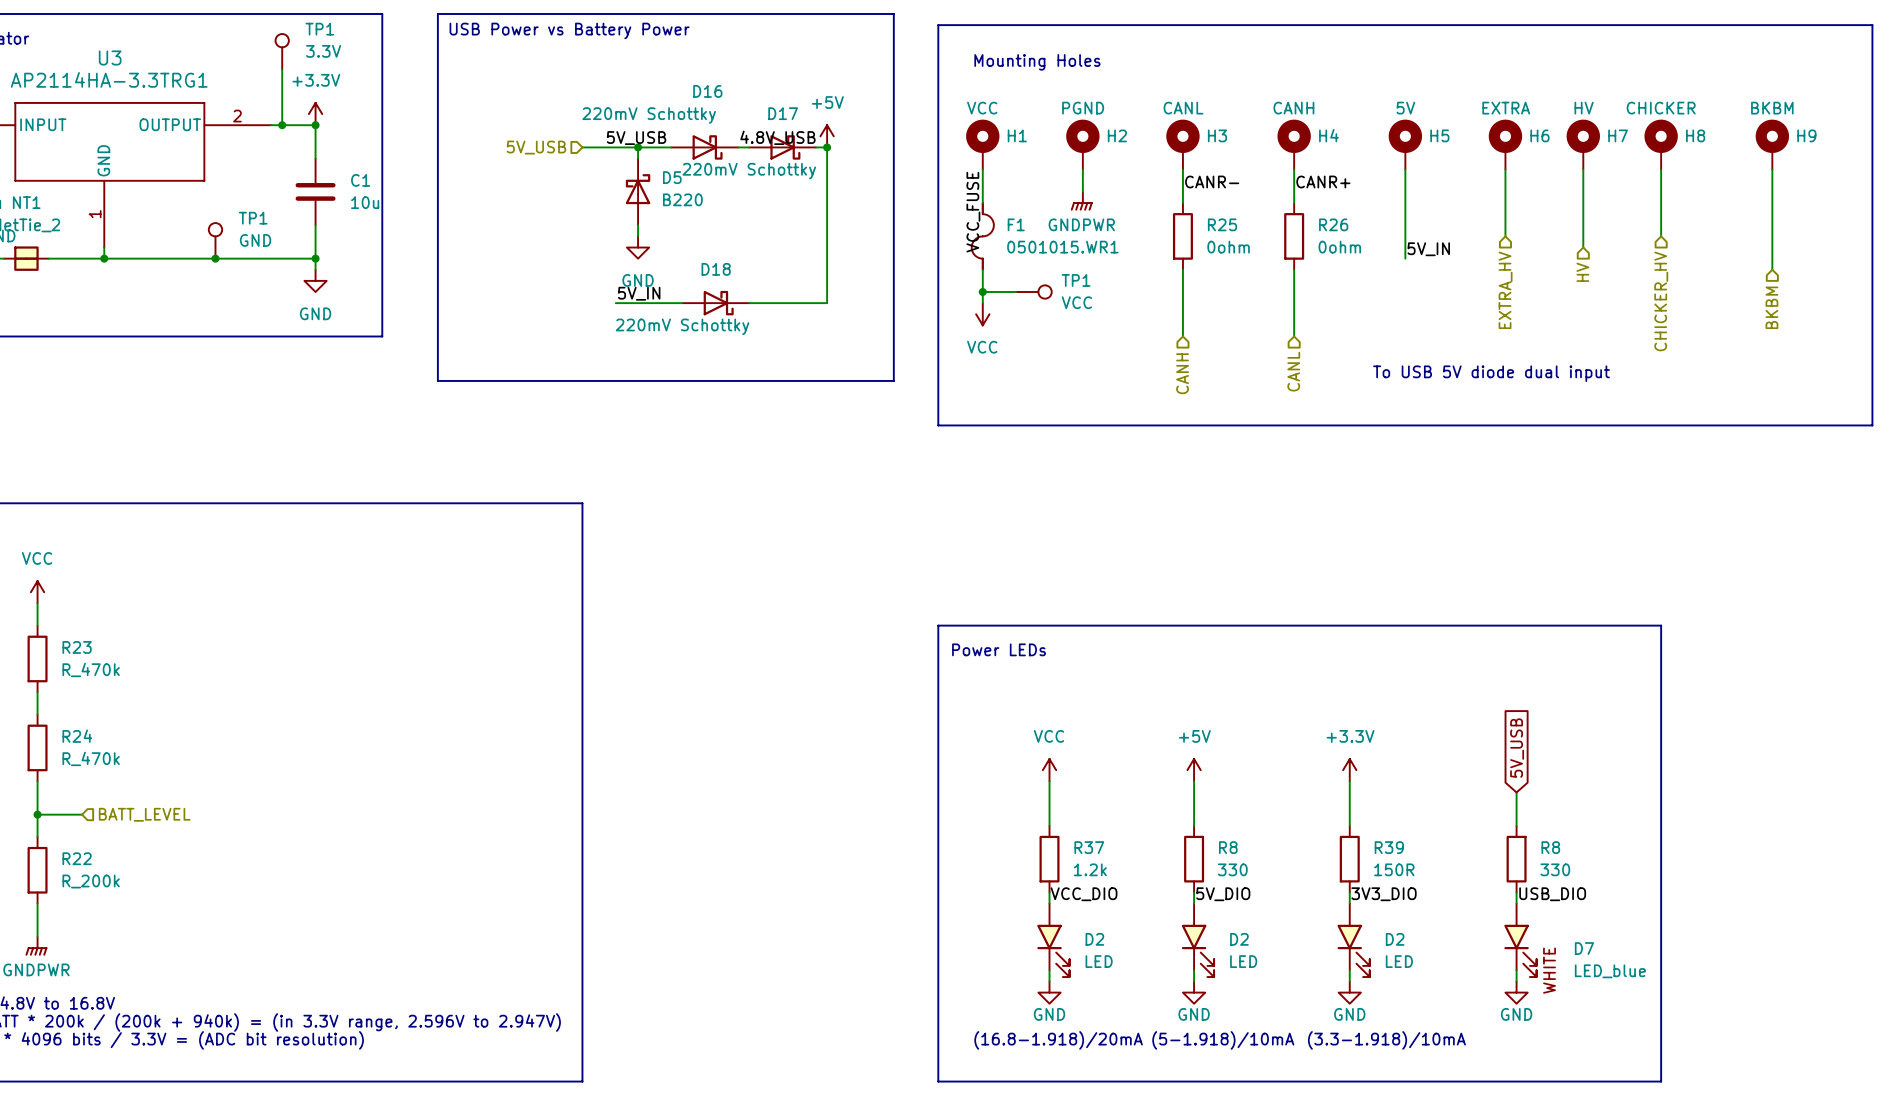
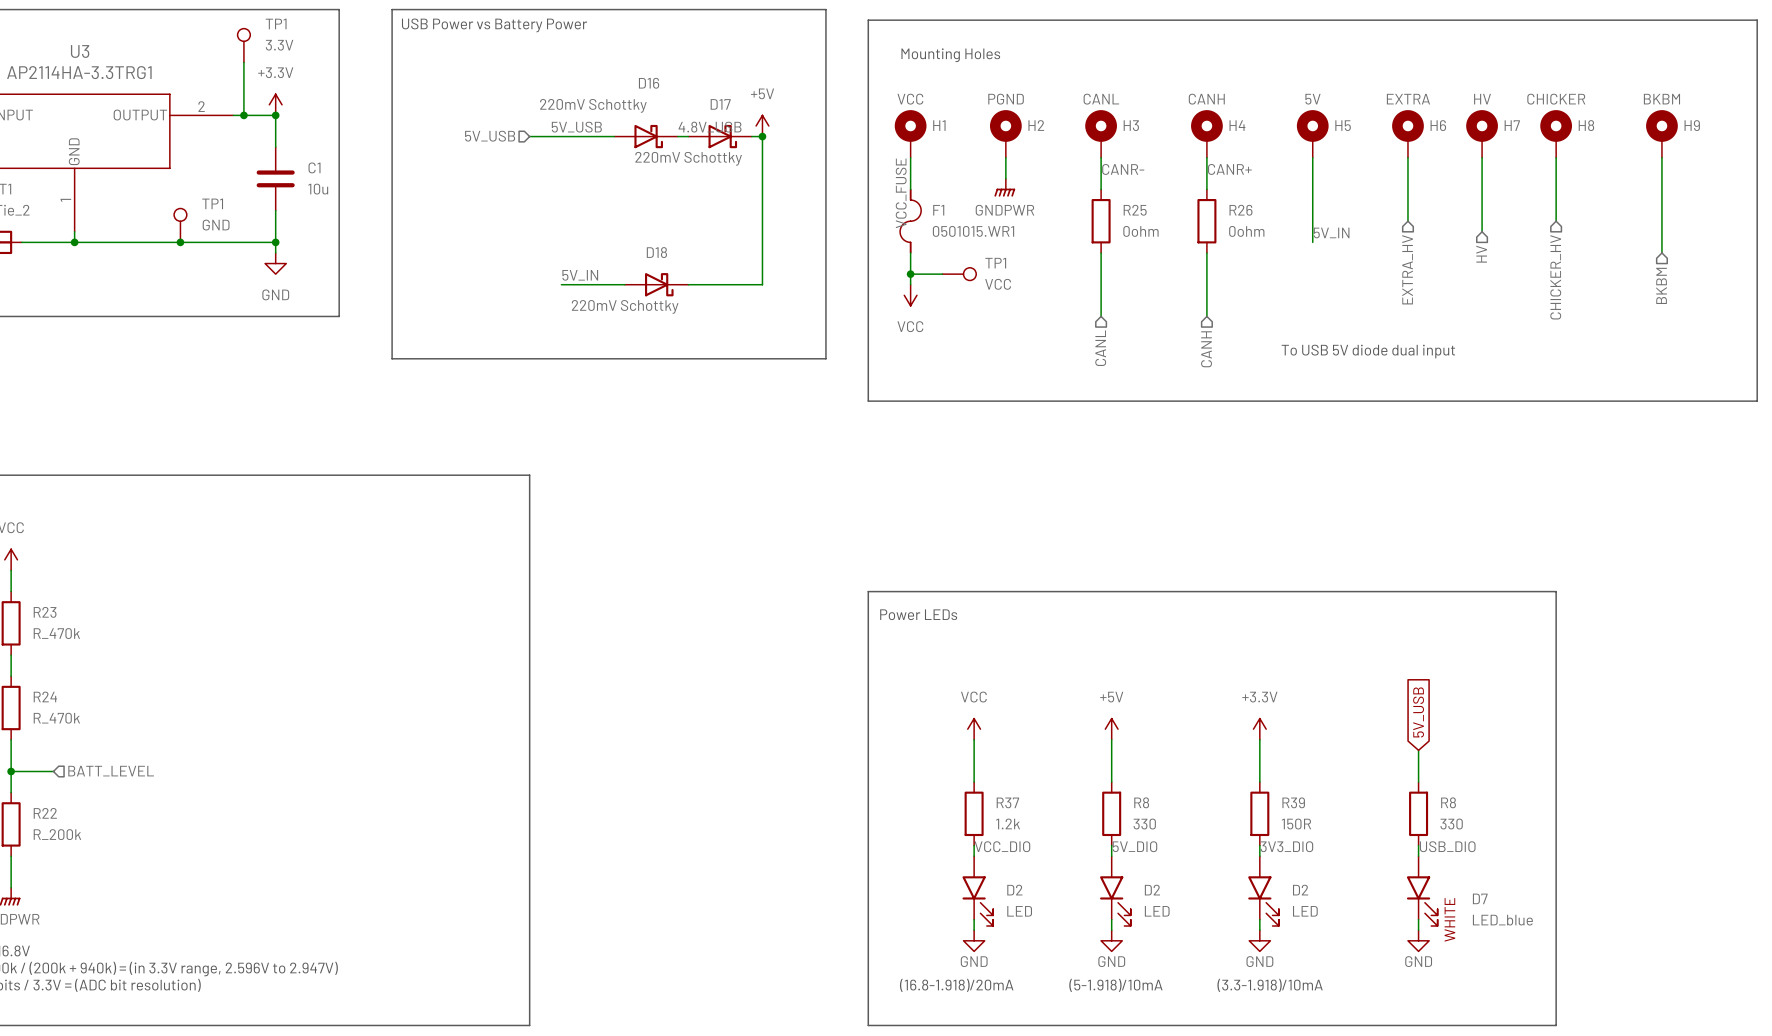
wire: (638, 147) (638, 158) -> none
junction: (638, 147) -> none
D5: B220 (638, 191) -> none
wire: (638, 225) (638, 236) -> none
power symbol: GND (638, 247) -> none
hierarchical label: CANL (1293, 371) -> CANH (1206, 349)
hierarchical label: CANH (1182, 373) -> CANL (1100, 348)

